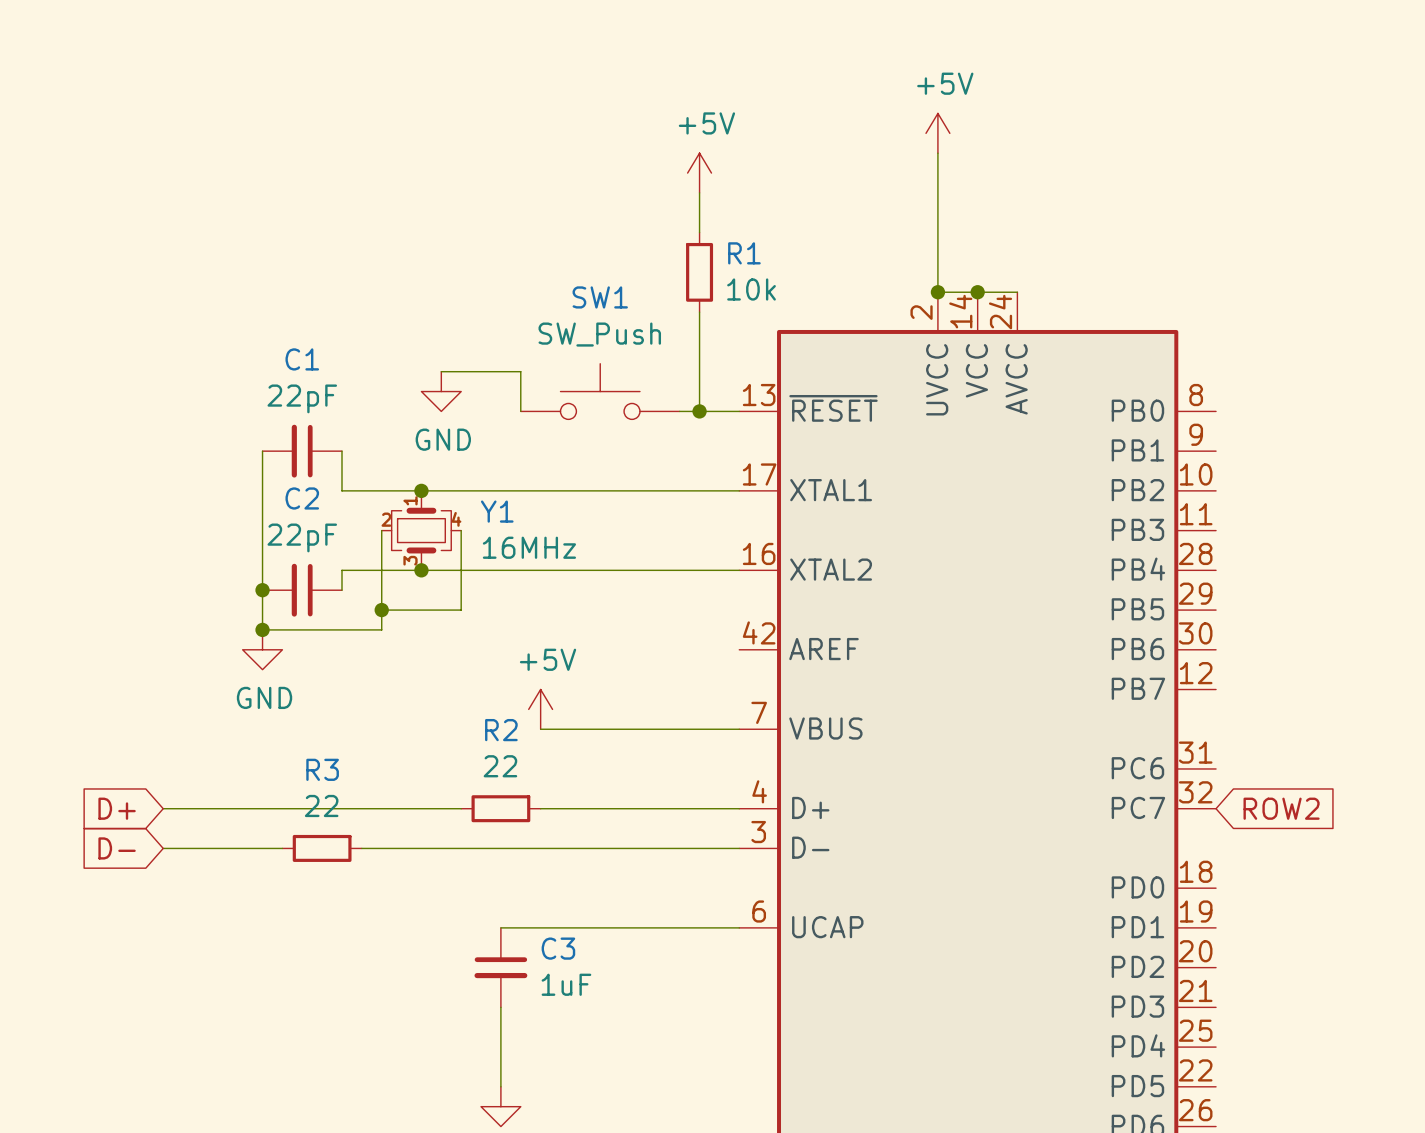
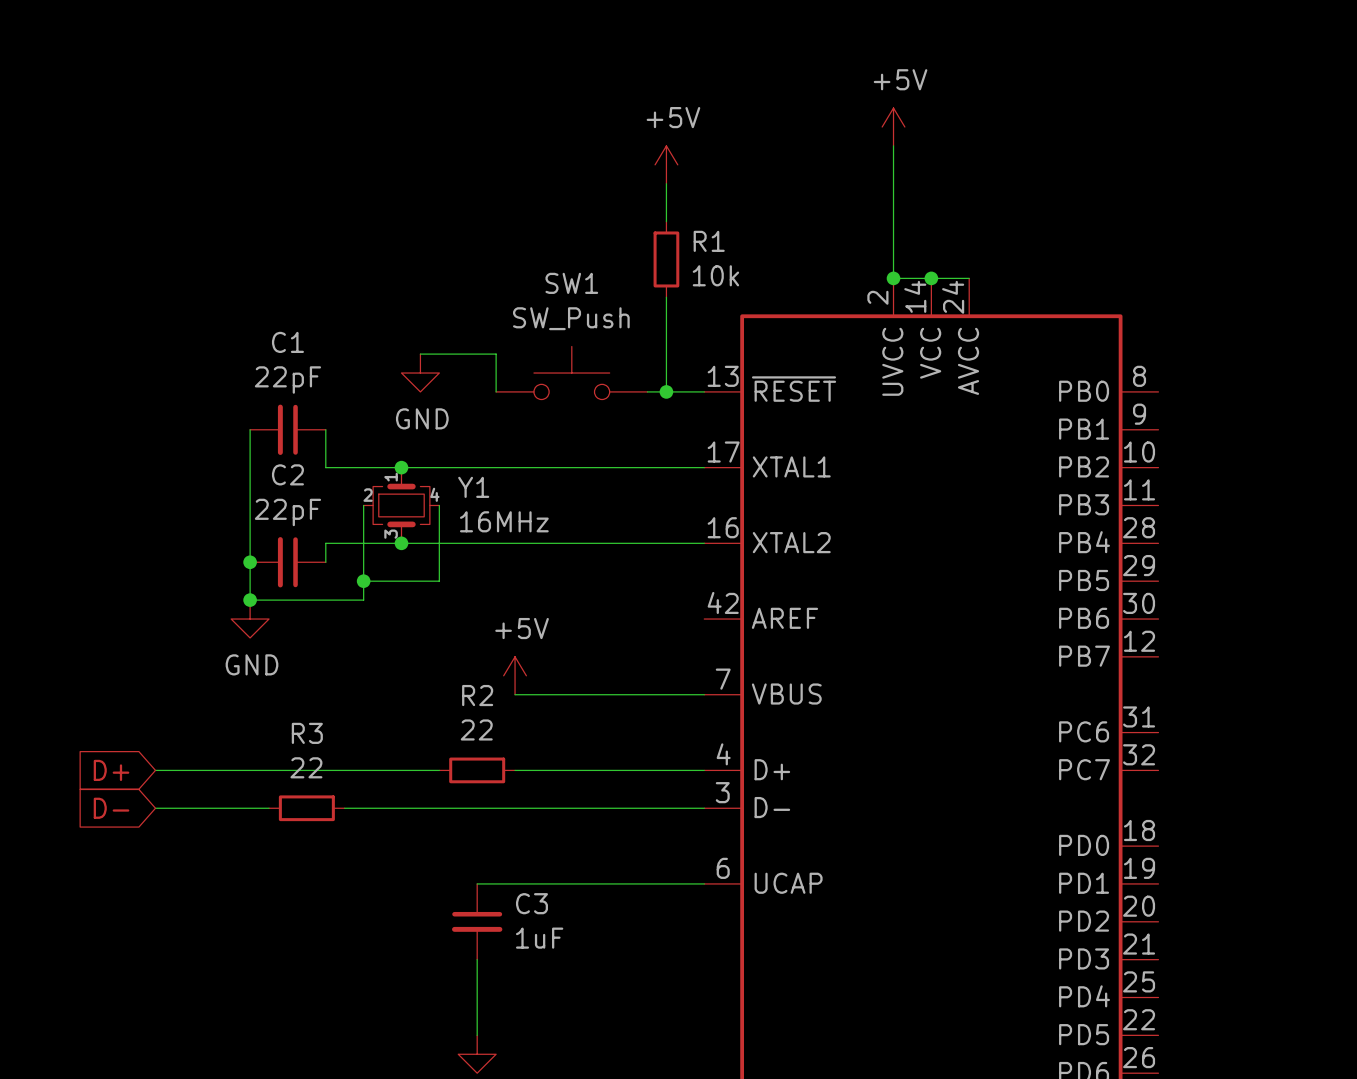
global label: ROW2 (1281, 808) -> none

